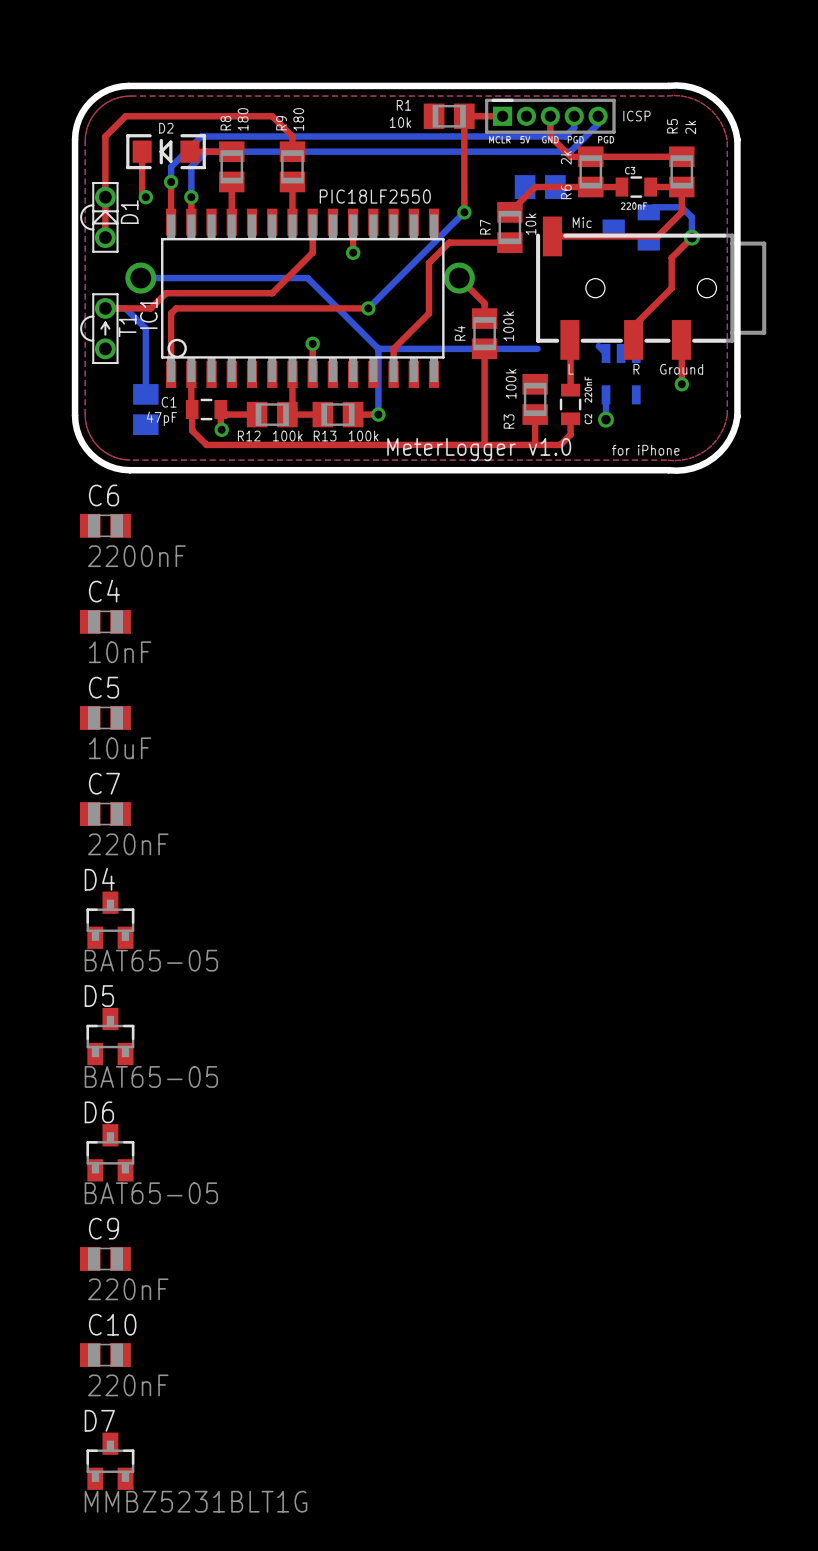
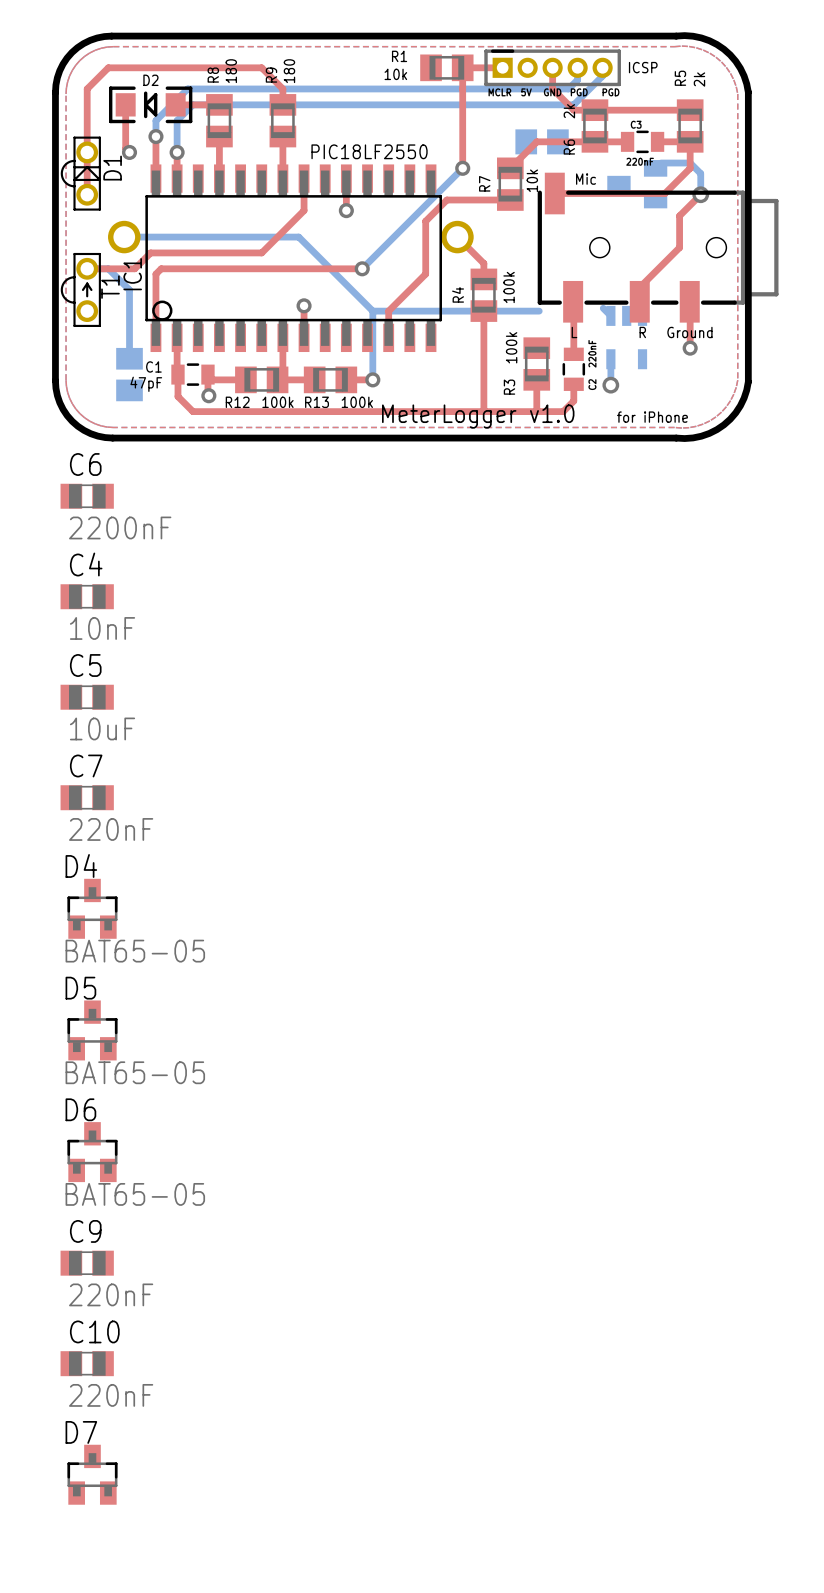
D7 value: MMBZ5231BLT1G (196, 1501) -> none

